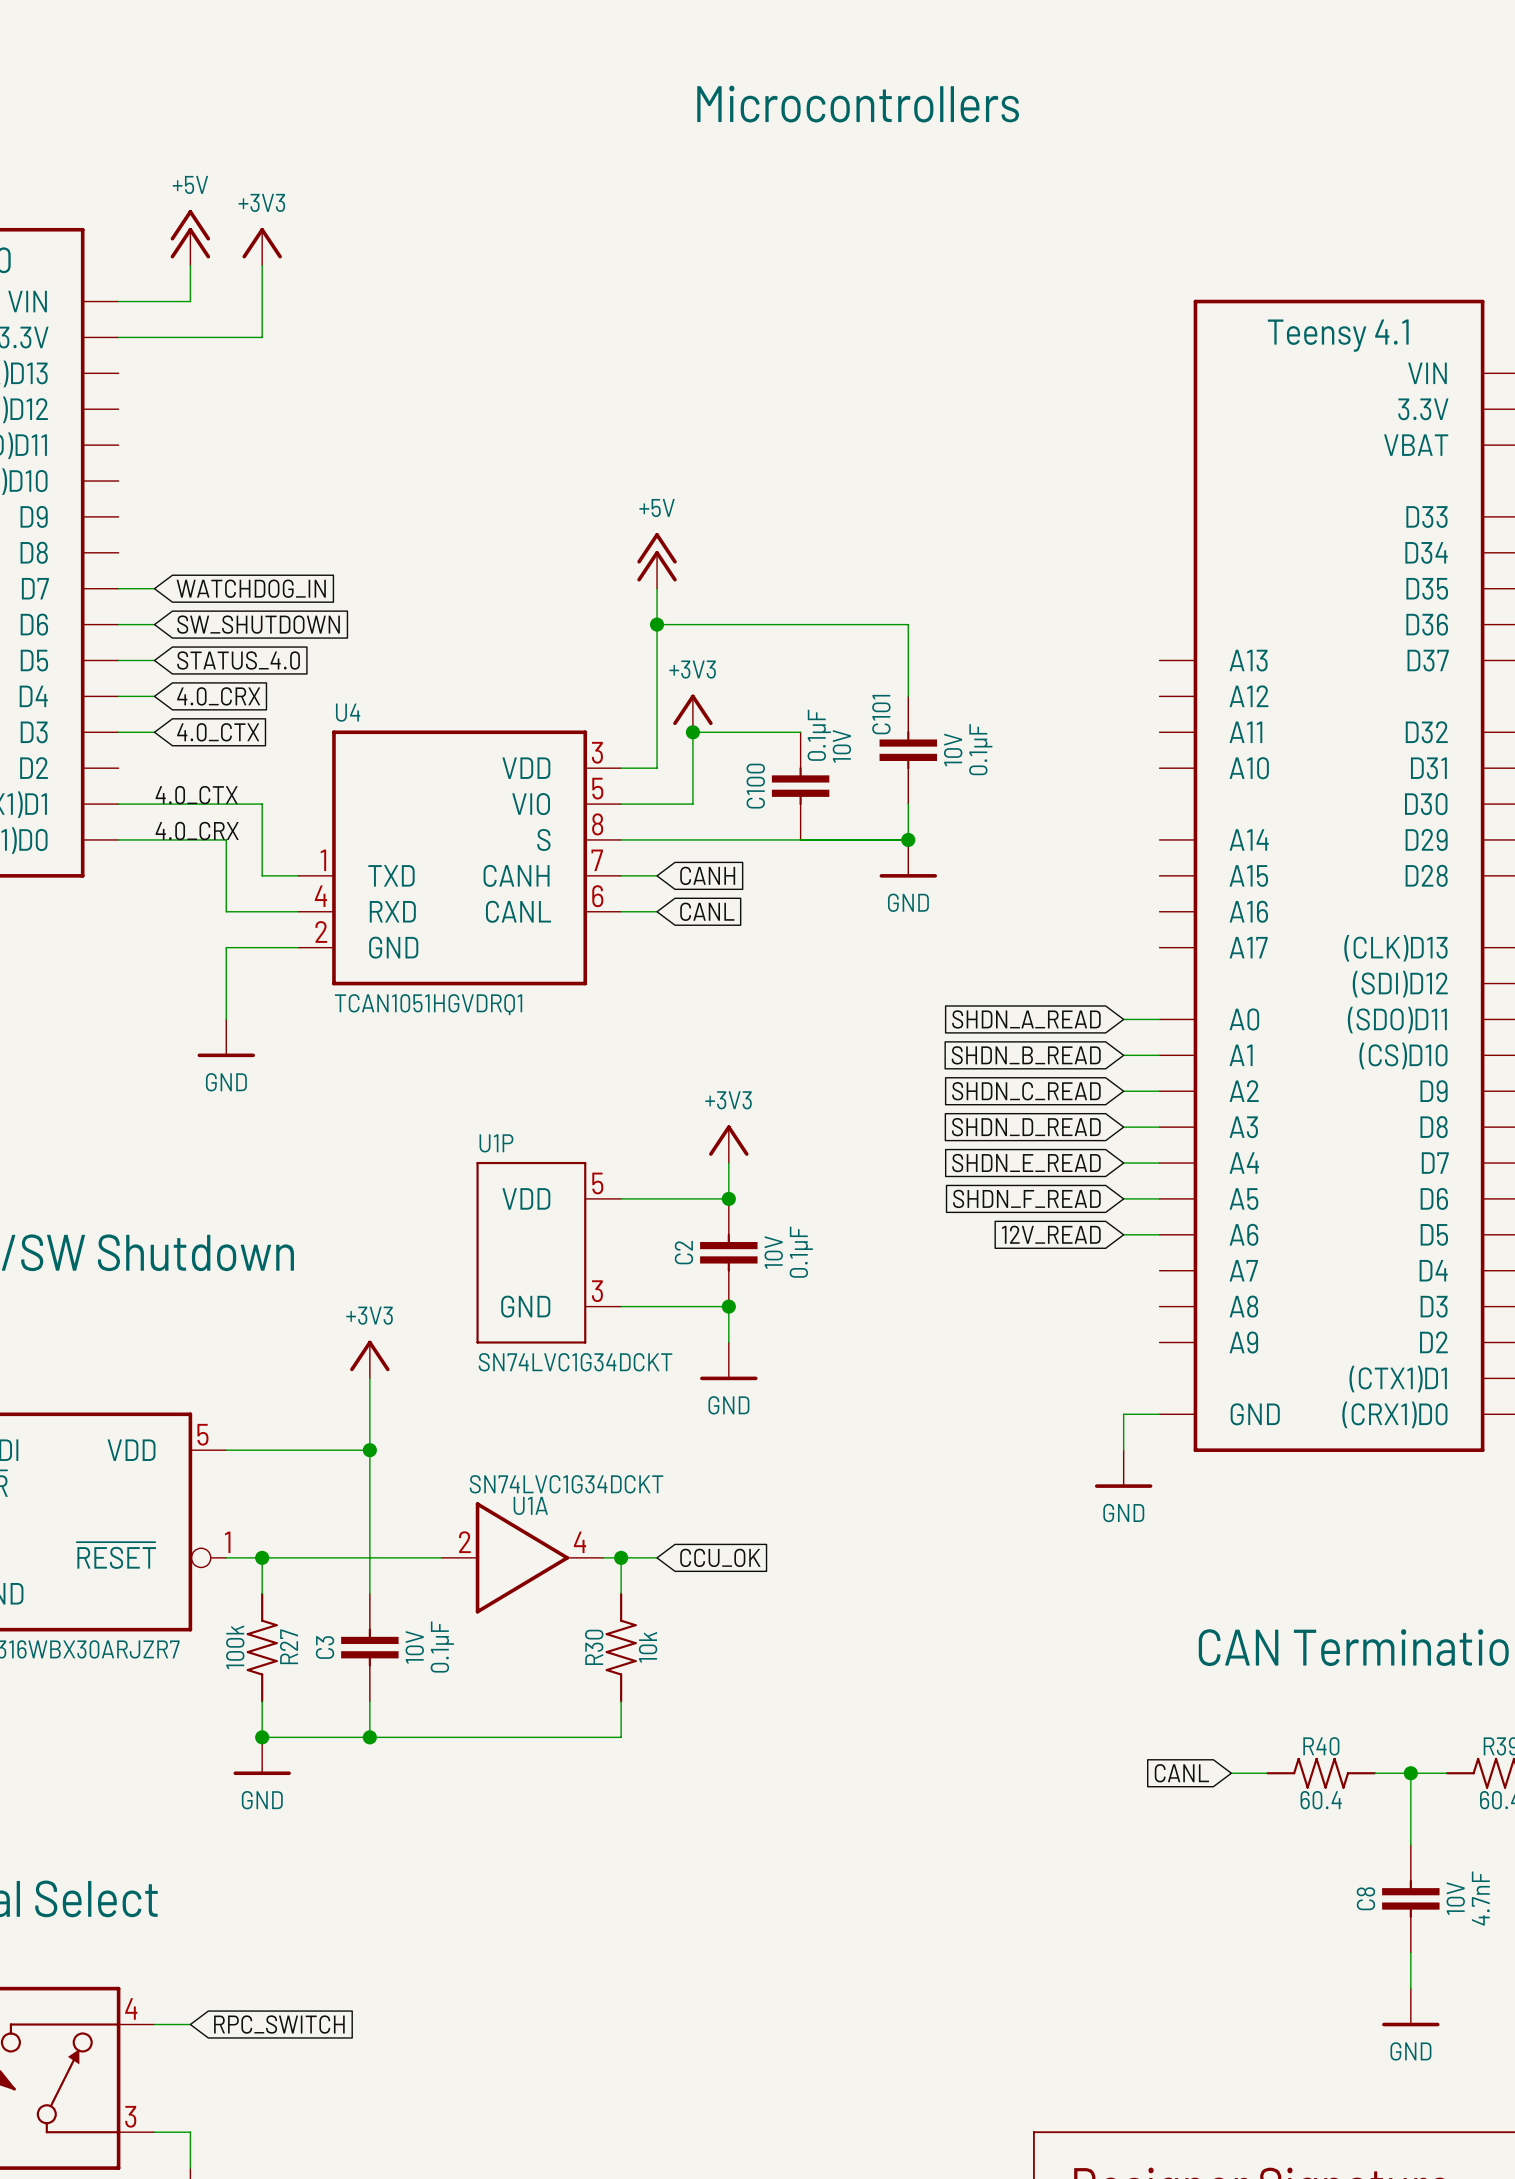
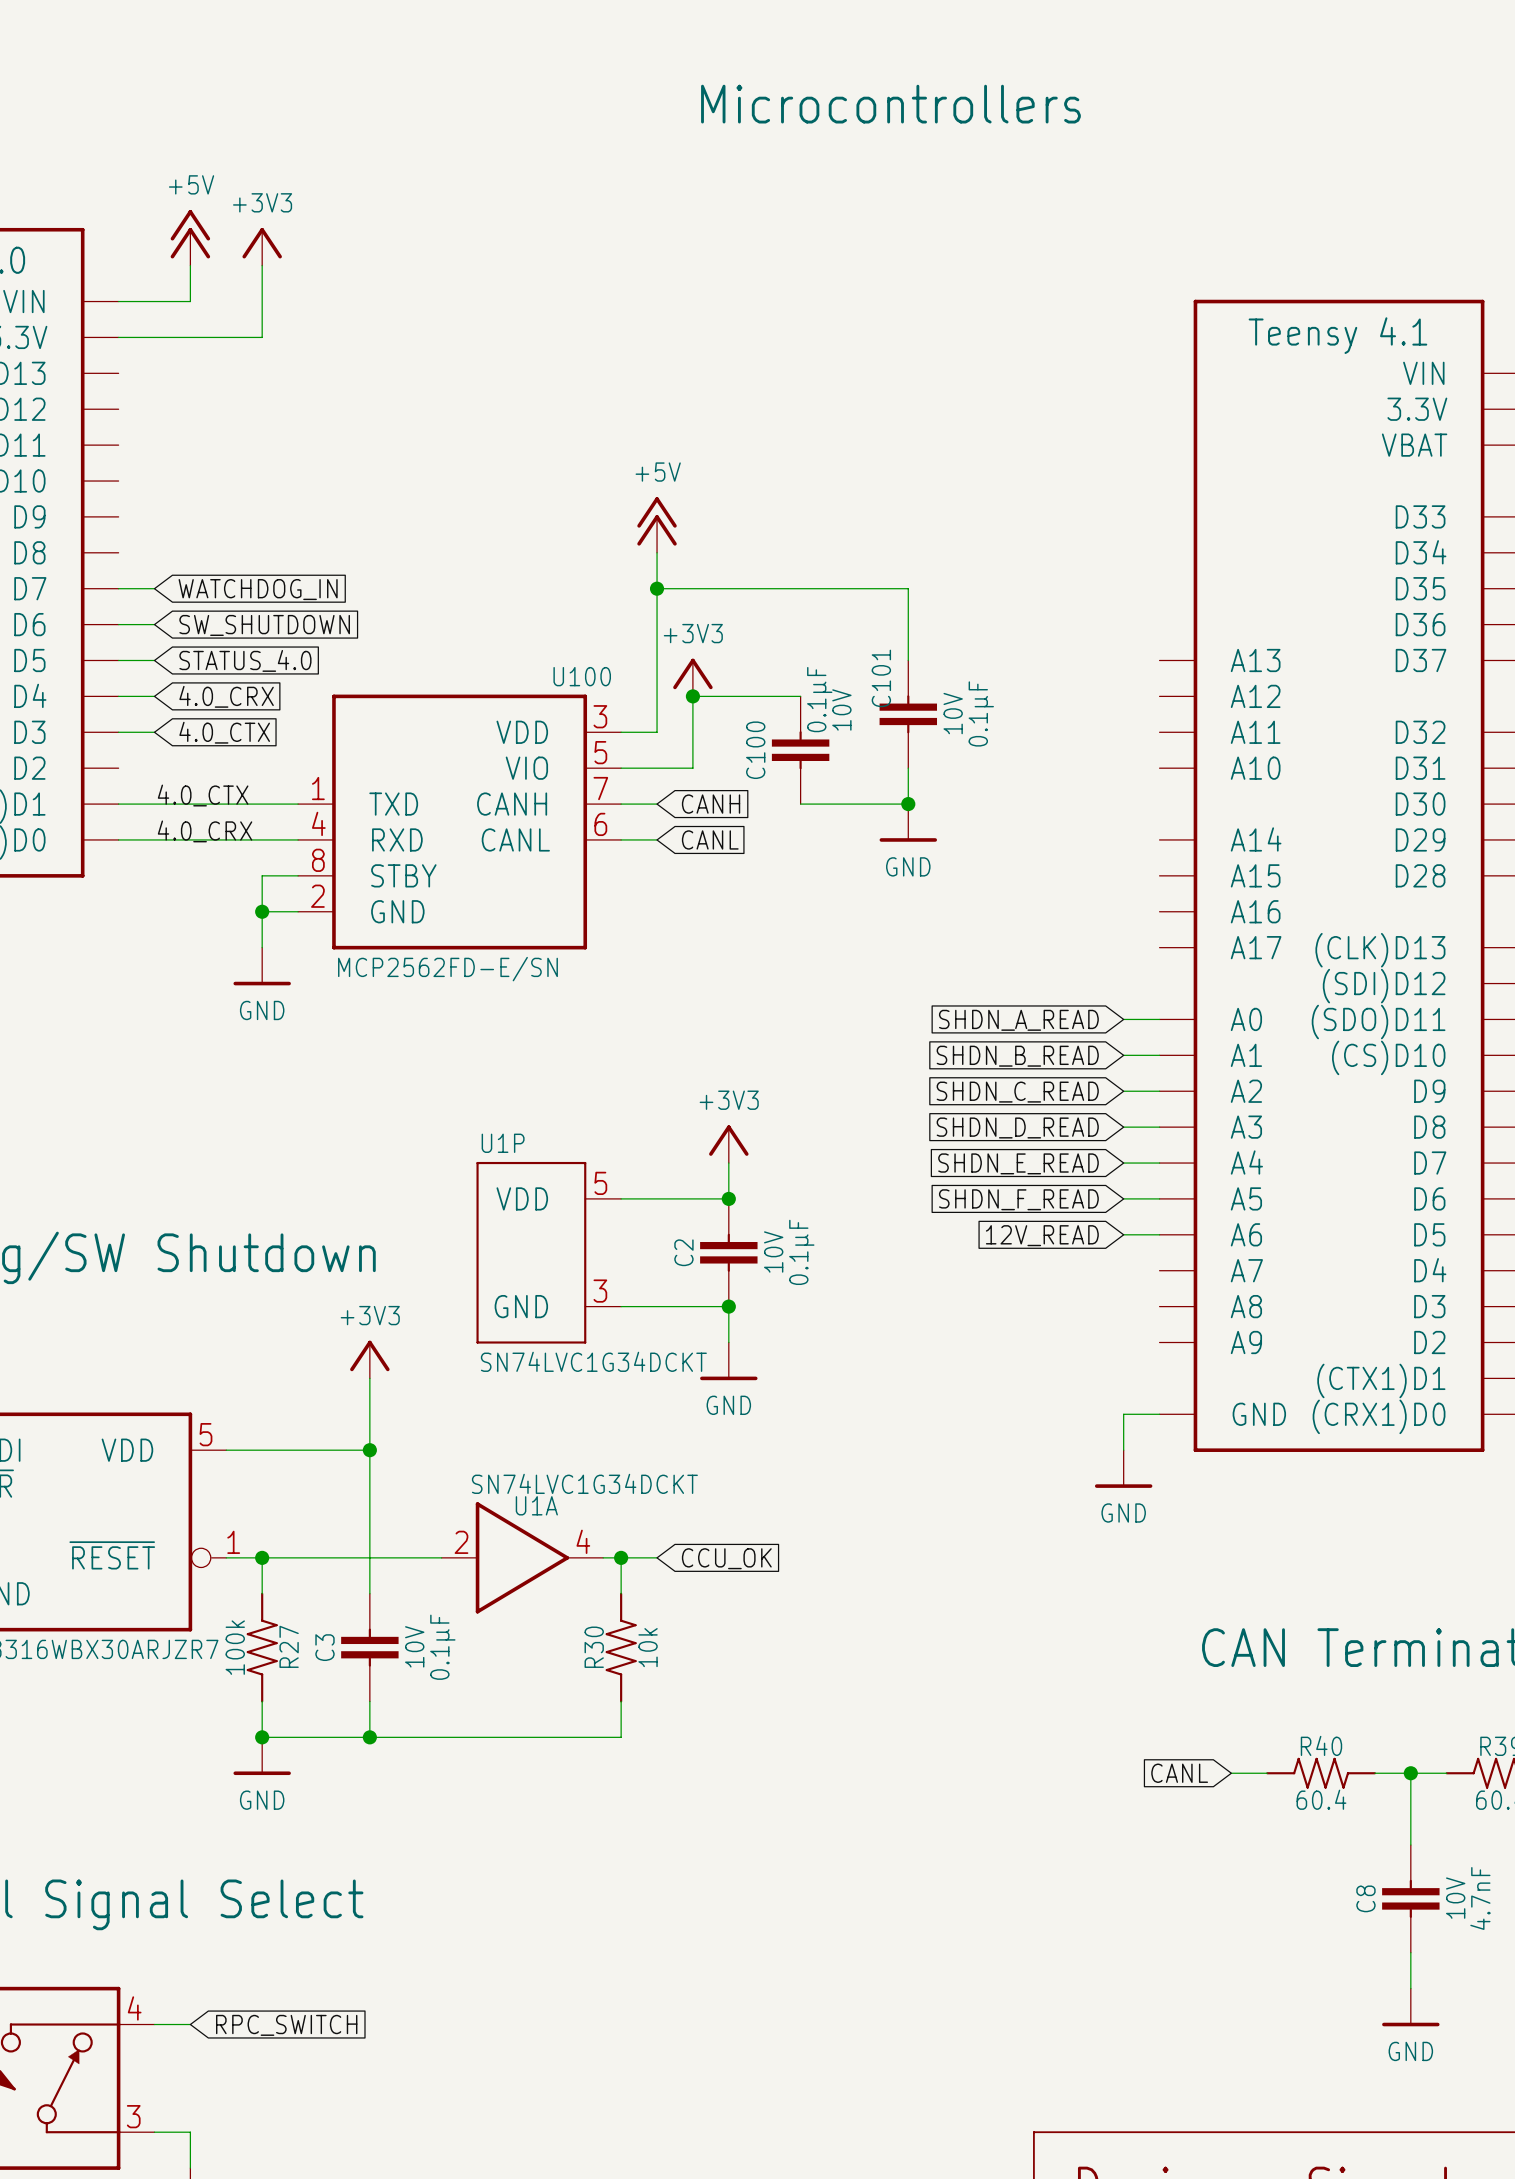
power symbol position: +5V (657, 560) -> +5V (657, 524)
wire: (657, 624) (908, 624) -> (657, 552) (657, 588) (908, 588) (908, 624)
junction position: (657, 624) -> (657, 588)
power symbol position: +3V3 (692, 713) -> +3V3 (692, 677)
wire: (657, 732) (657, 768) -> (657, 732) (621, 732)
wire: (692, 732) (800, 732) -> (692, 732) (692, 696) (800, 696)
junction position: (692, 732) -> (692, 696)
C101 position: (908, 750) -> (908, 714)
wire: (692, 768) (692, 804) (657, 804) -> (692, 768) (657, 768)
wire: none -> (908, 768) (908, 804) (800, 804)
C100 position: (800, 786) -> (800, 750)
wire: (262, 804) (262, 875) -> (262, 804) (298, 804)
wire: (908, 804) (908, 839) (657, 839) -> none
U100: none -> (459, 822)
wire: (226, 839) (226, 911) (262, 911) -> (226, 839) (298, 839)
junction position: (908, 839) -> (908, 804)
U4: (459, 857) -> none
power symbol position: GND (908, 858) -> GND (908, 822)
wire: none -> (262, 875) (262, 947)
wire: (621, 875) (657, 875) -> none
global label position: CANH (707, 875) -> CANH (711, 804)
junction: none -> (262, 911)
wire: (621, 911) (657, 911) -> none
global label position: CANL (707, 911) -> CANL (710, 839)
wire: (298, 947) (226, 947) (226, 1019) -> none
power symbol position: GND (226, 1038) -> GND (262, 966)

